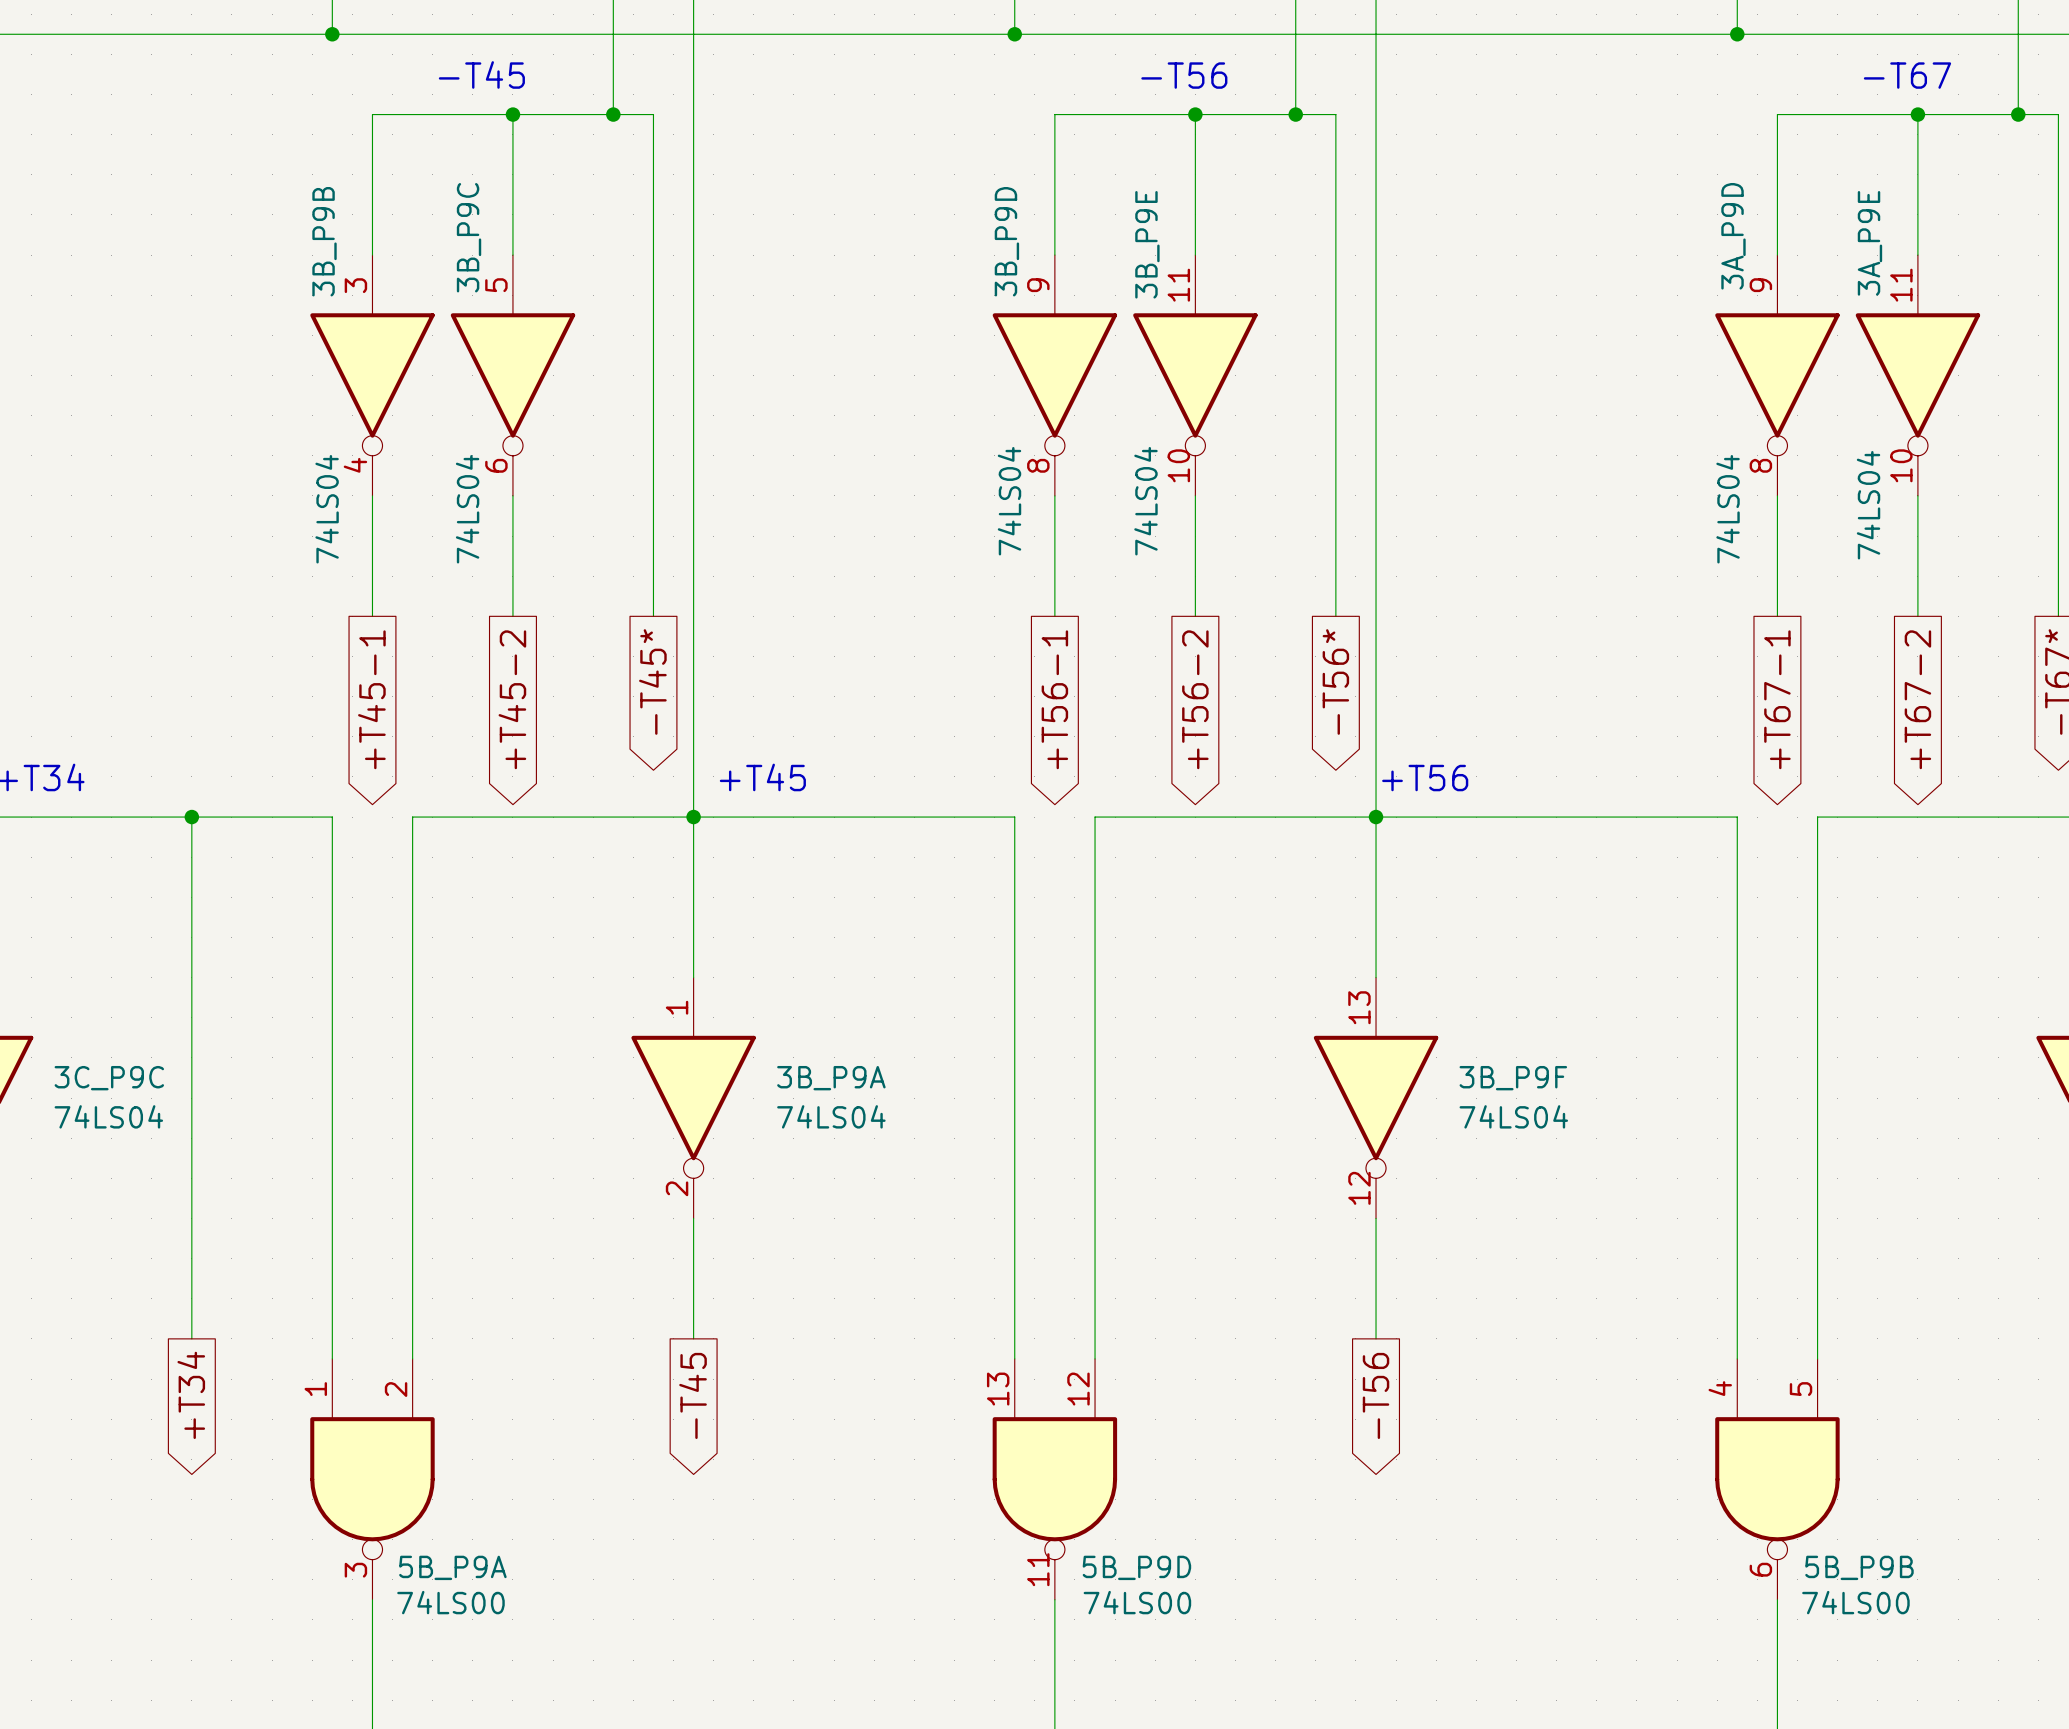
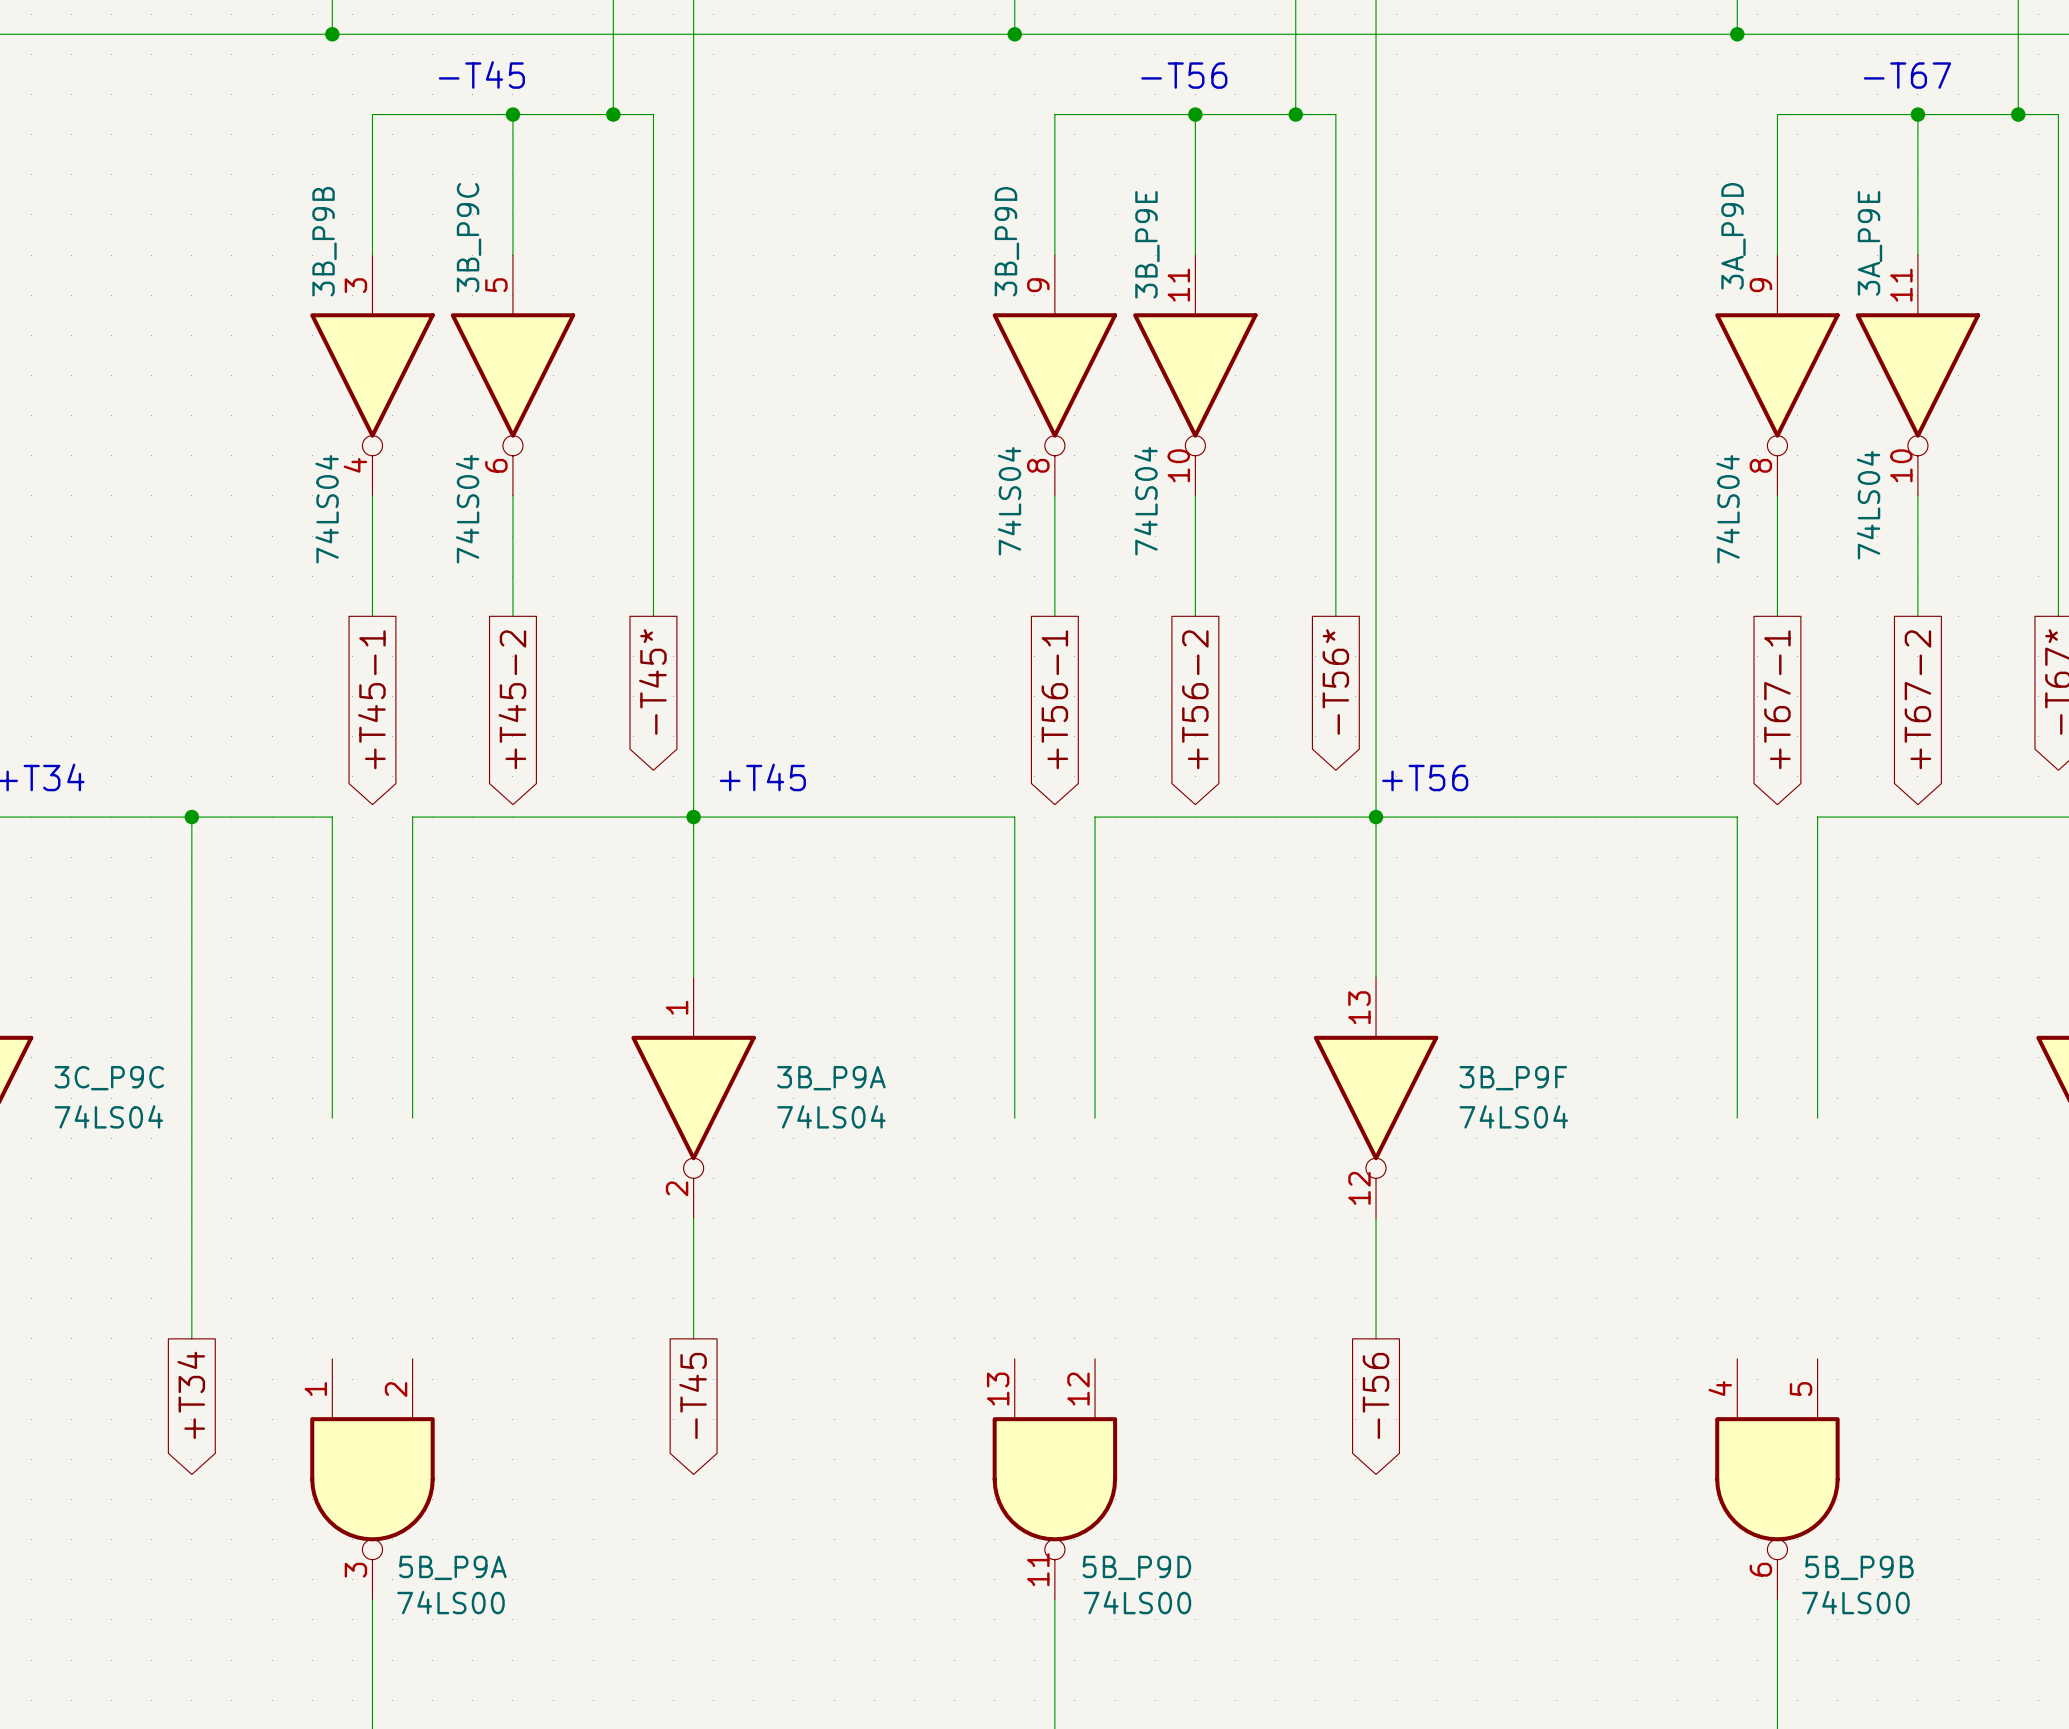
wire: (332, 1118) (332, 1358) -> none
wire: (412, 1118) (412, 1358) -> none
wire: (1014, 1118) (1014, 1358) -> none
wire: (1095, 1118) (1095, 1358) -> none
wire: (1737, 1118) (1737, 1358) -> none
wire: (1817, 1118) (1817, 1358) -> none

